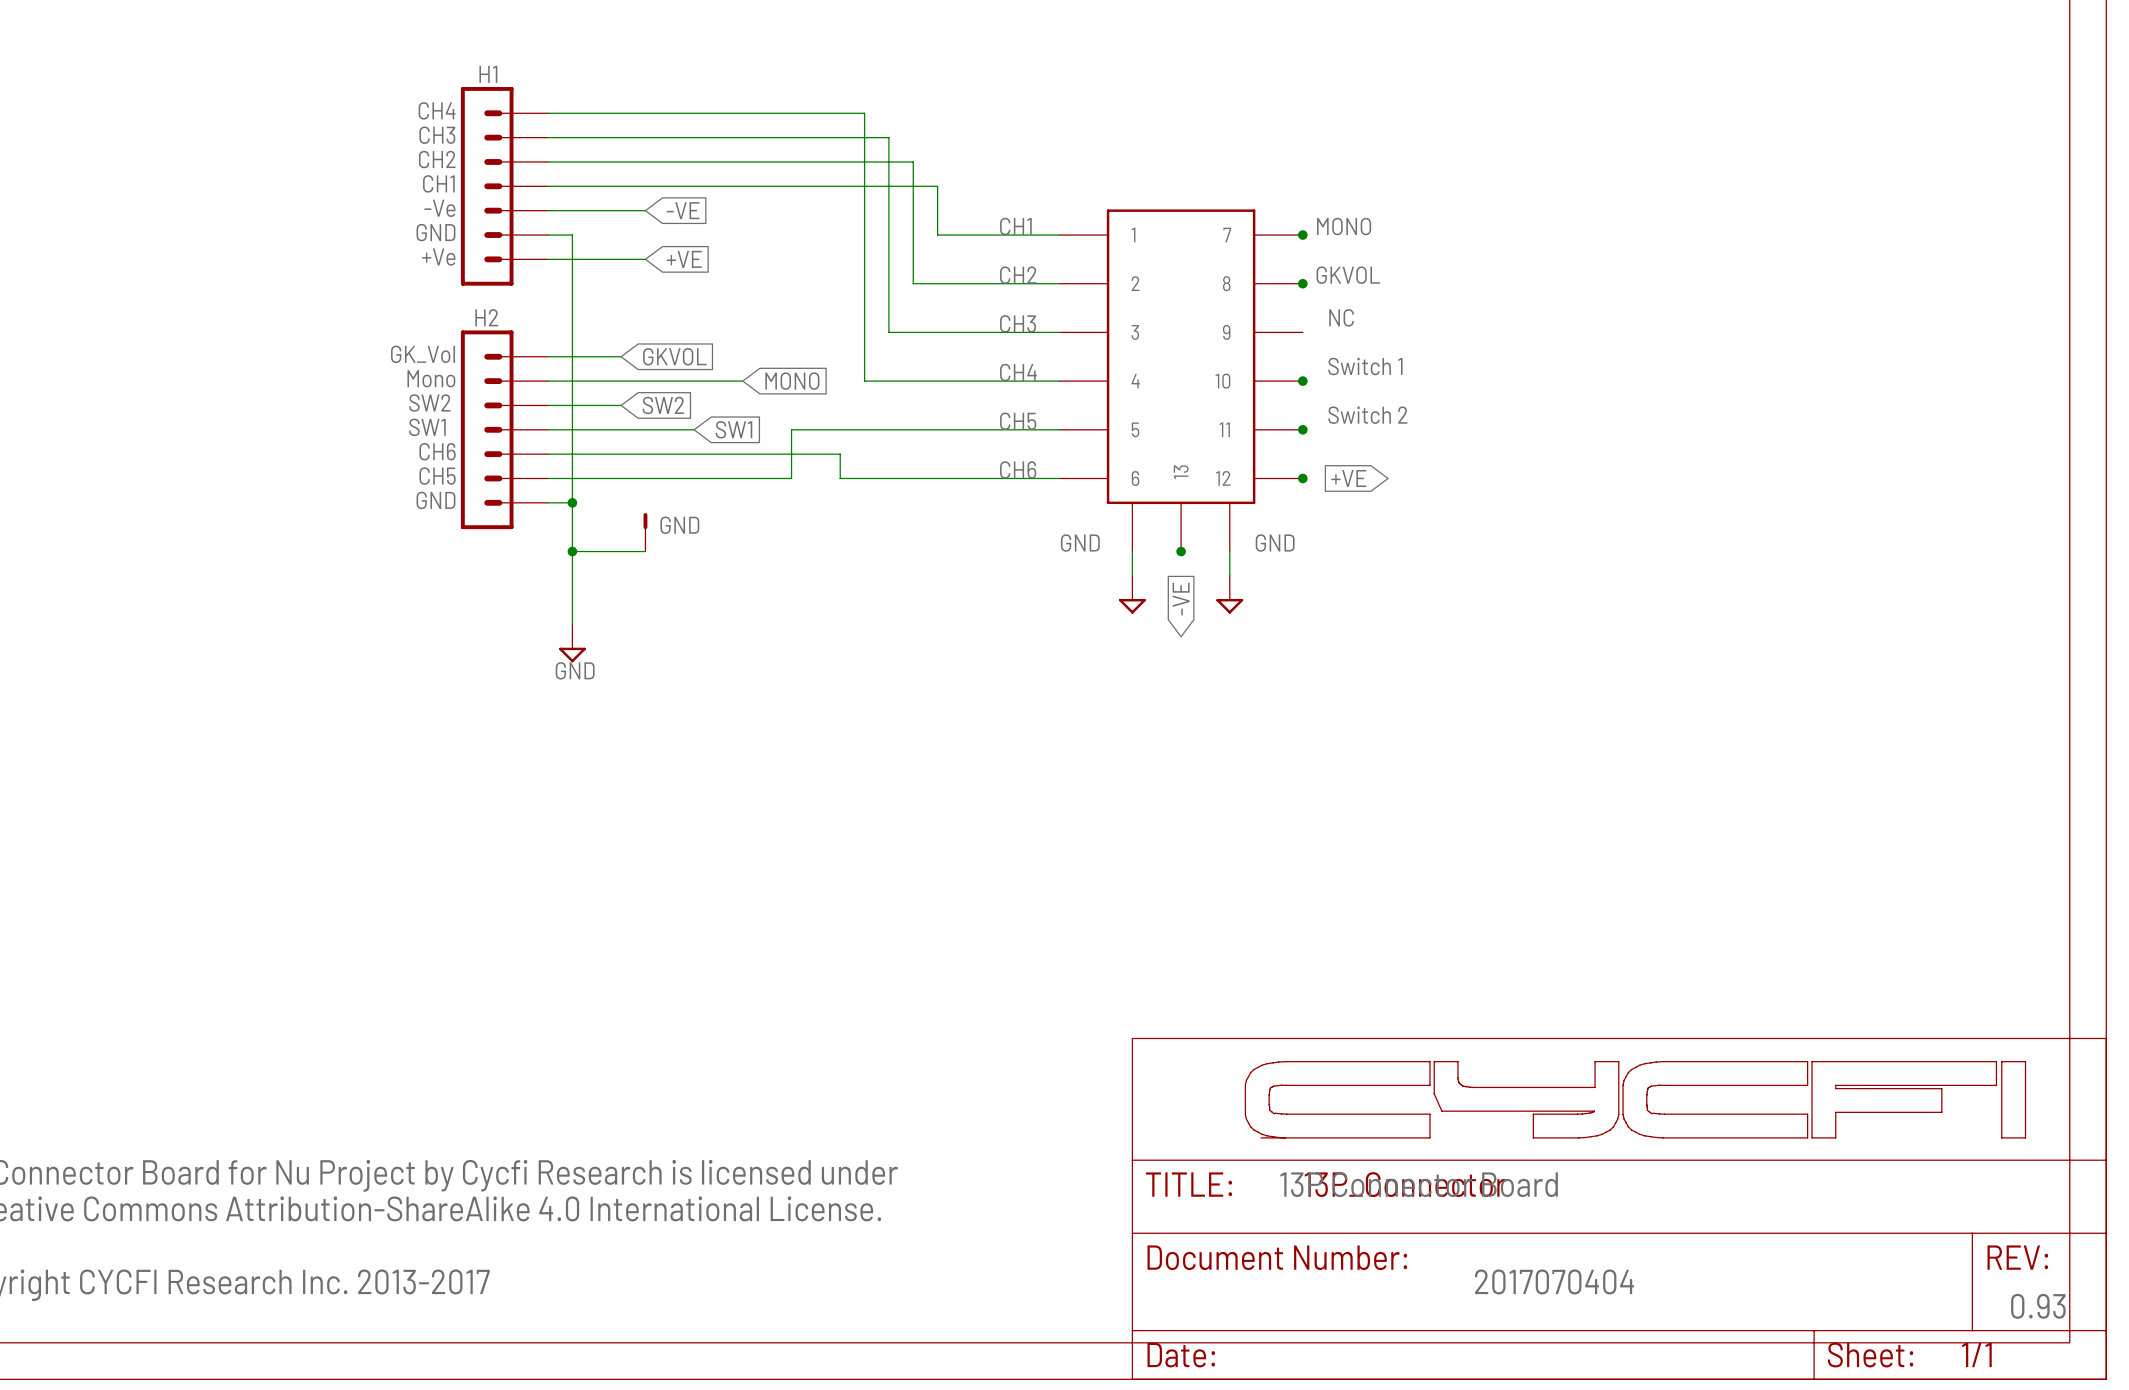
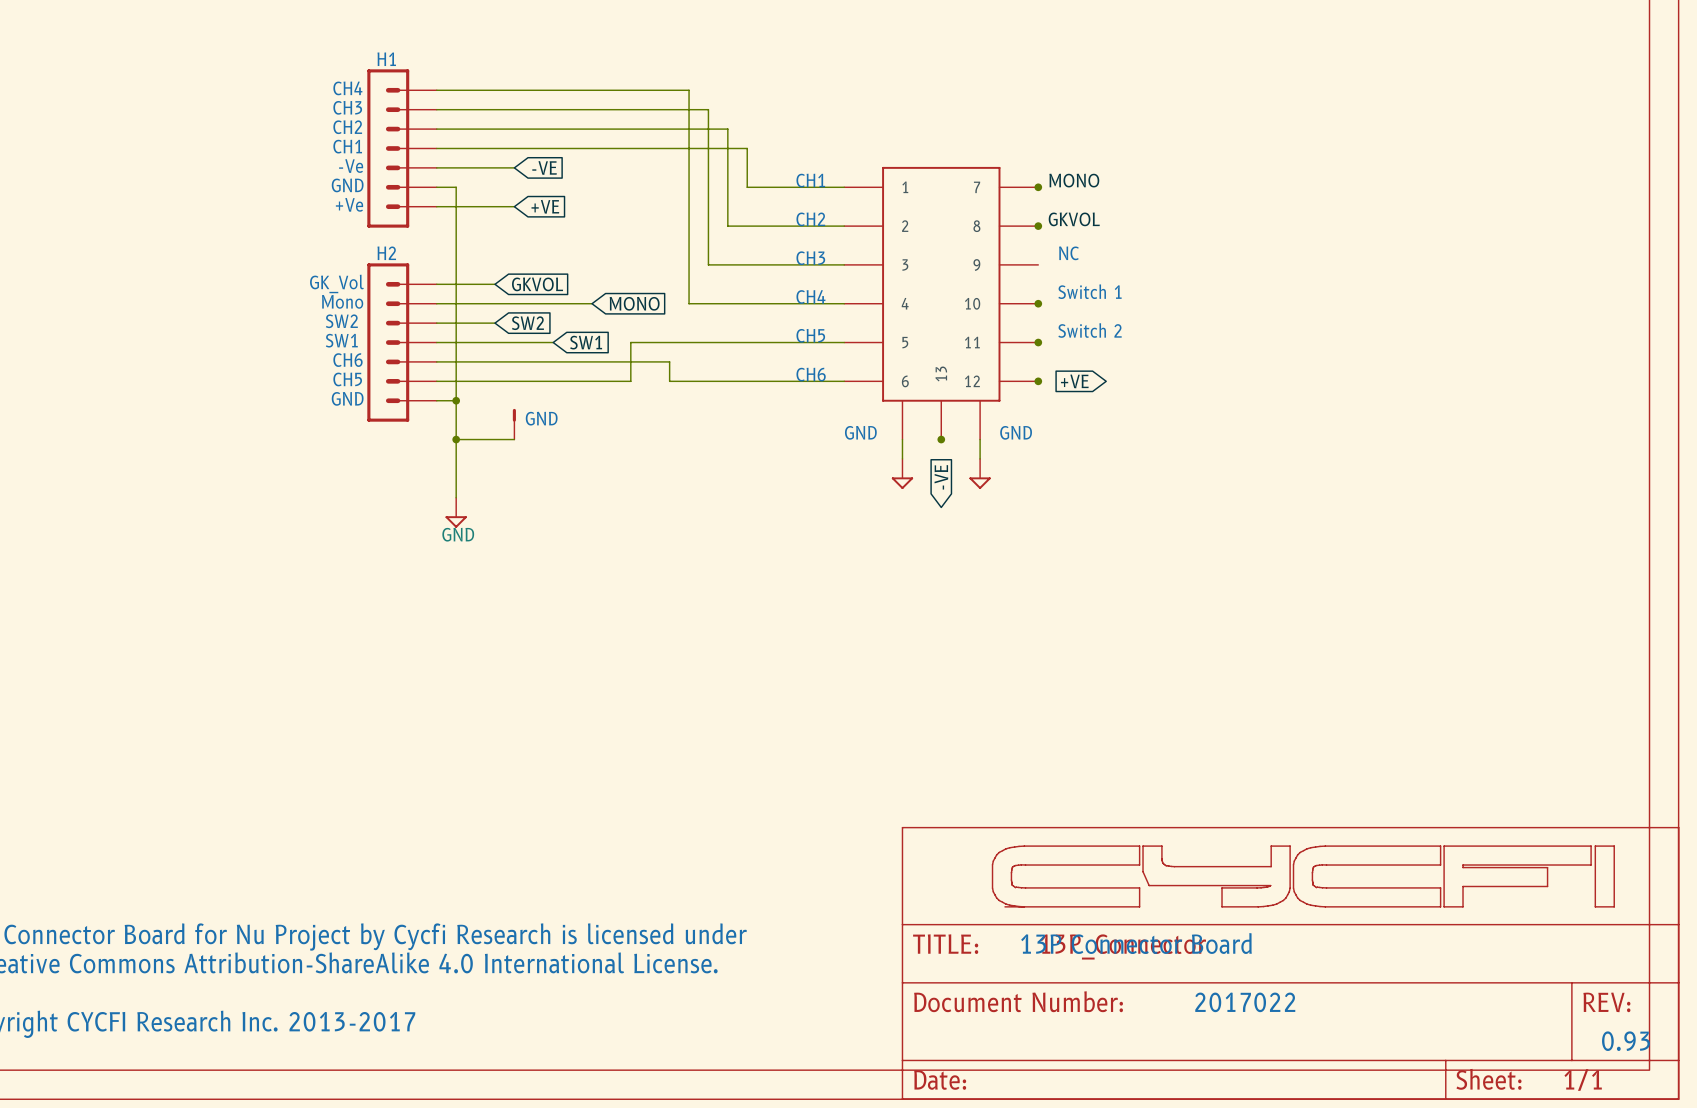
text: none -> 2017022 (1245, 1002)
text: 2017070404 (1554, 1281) -> none

